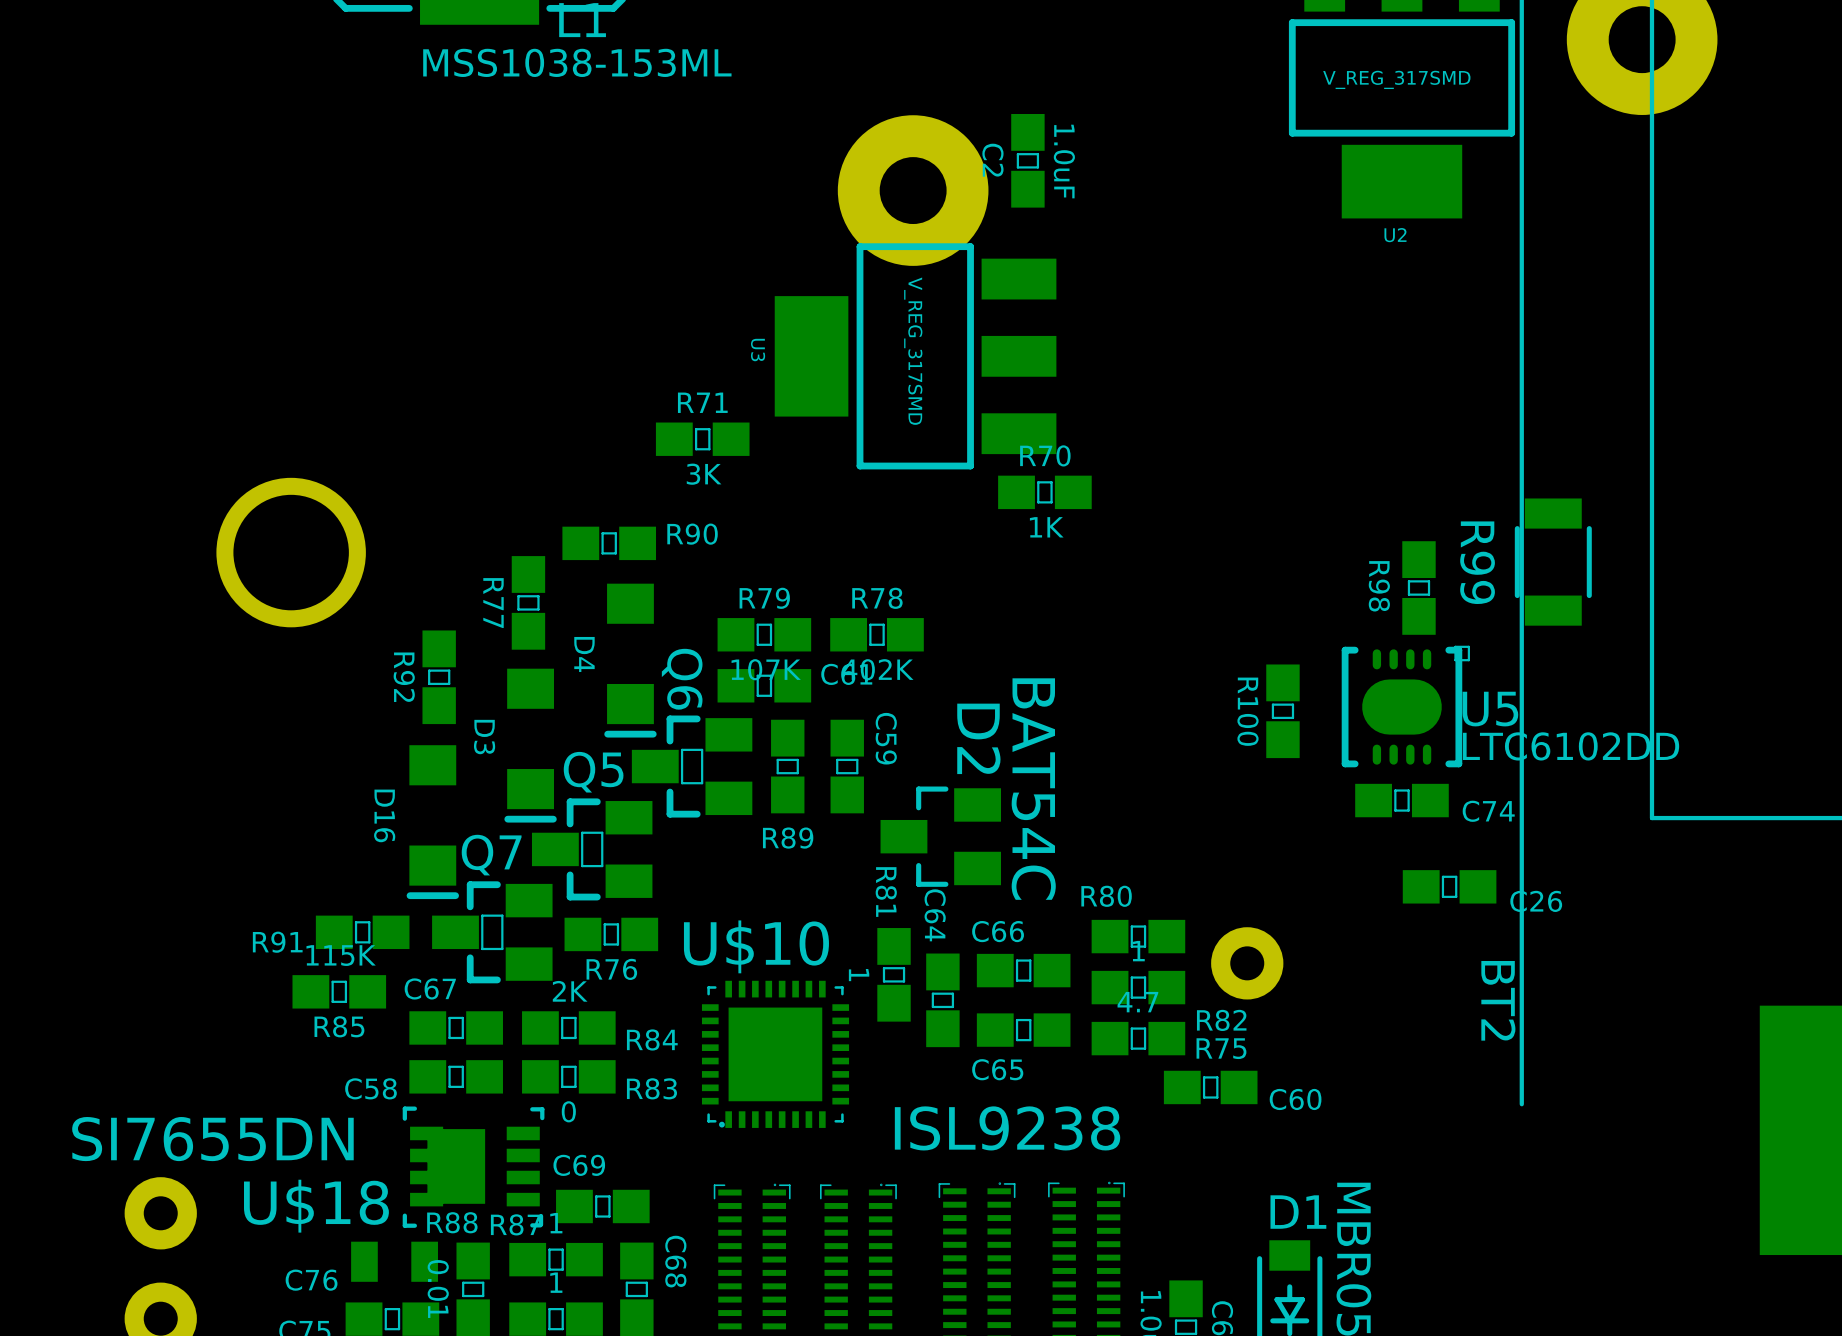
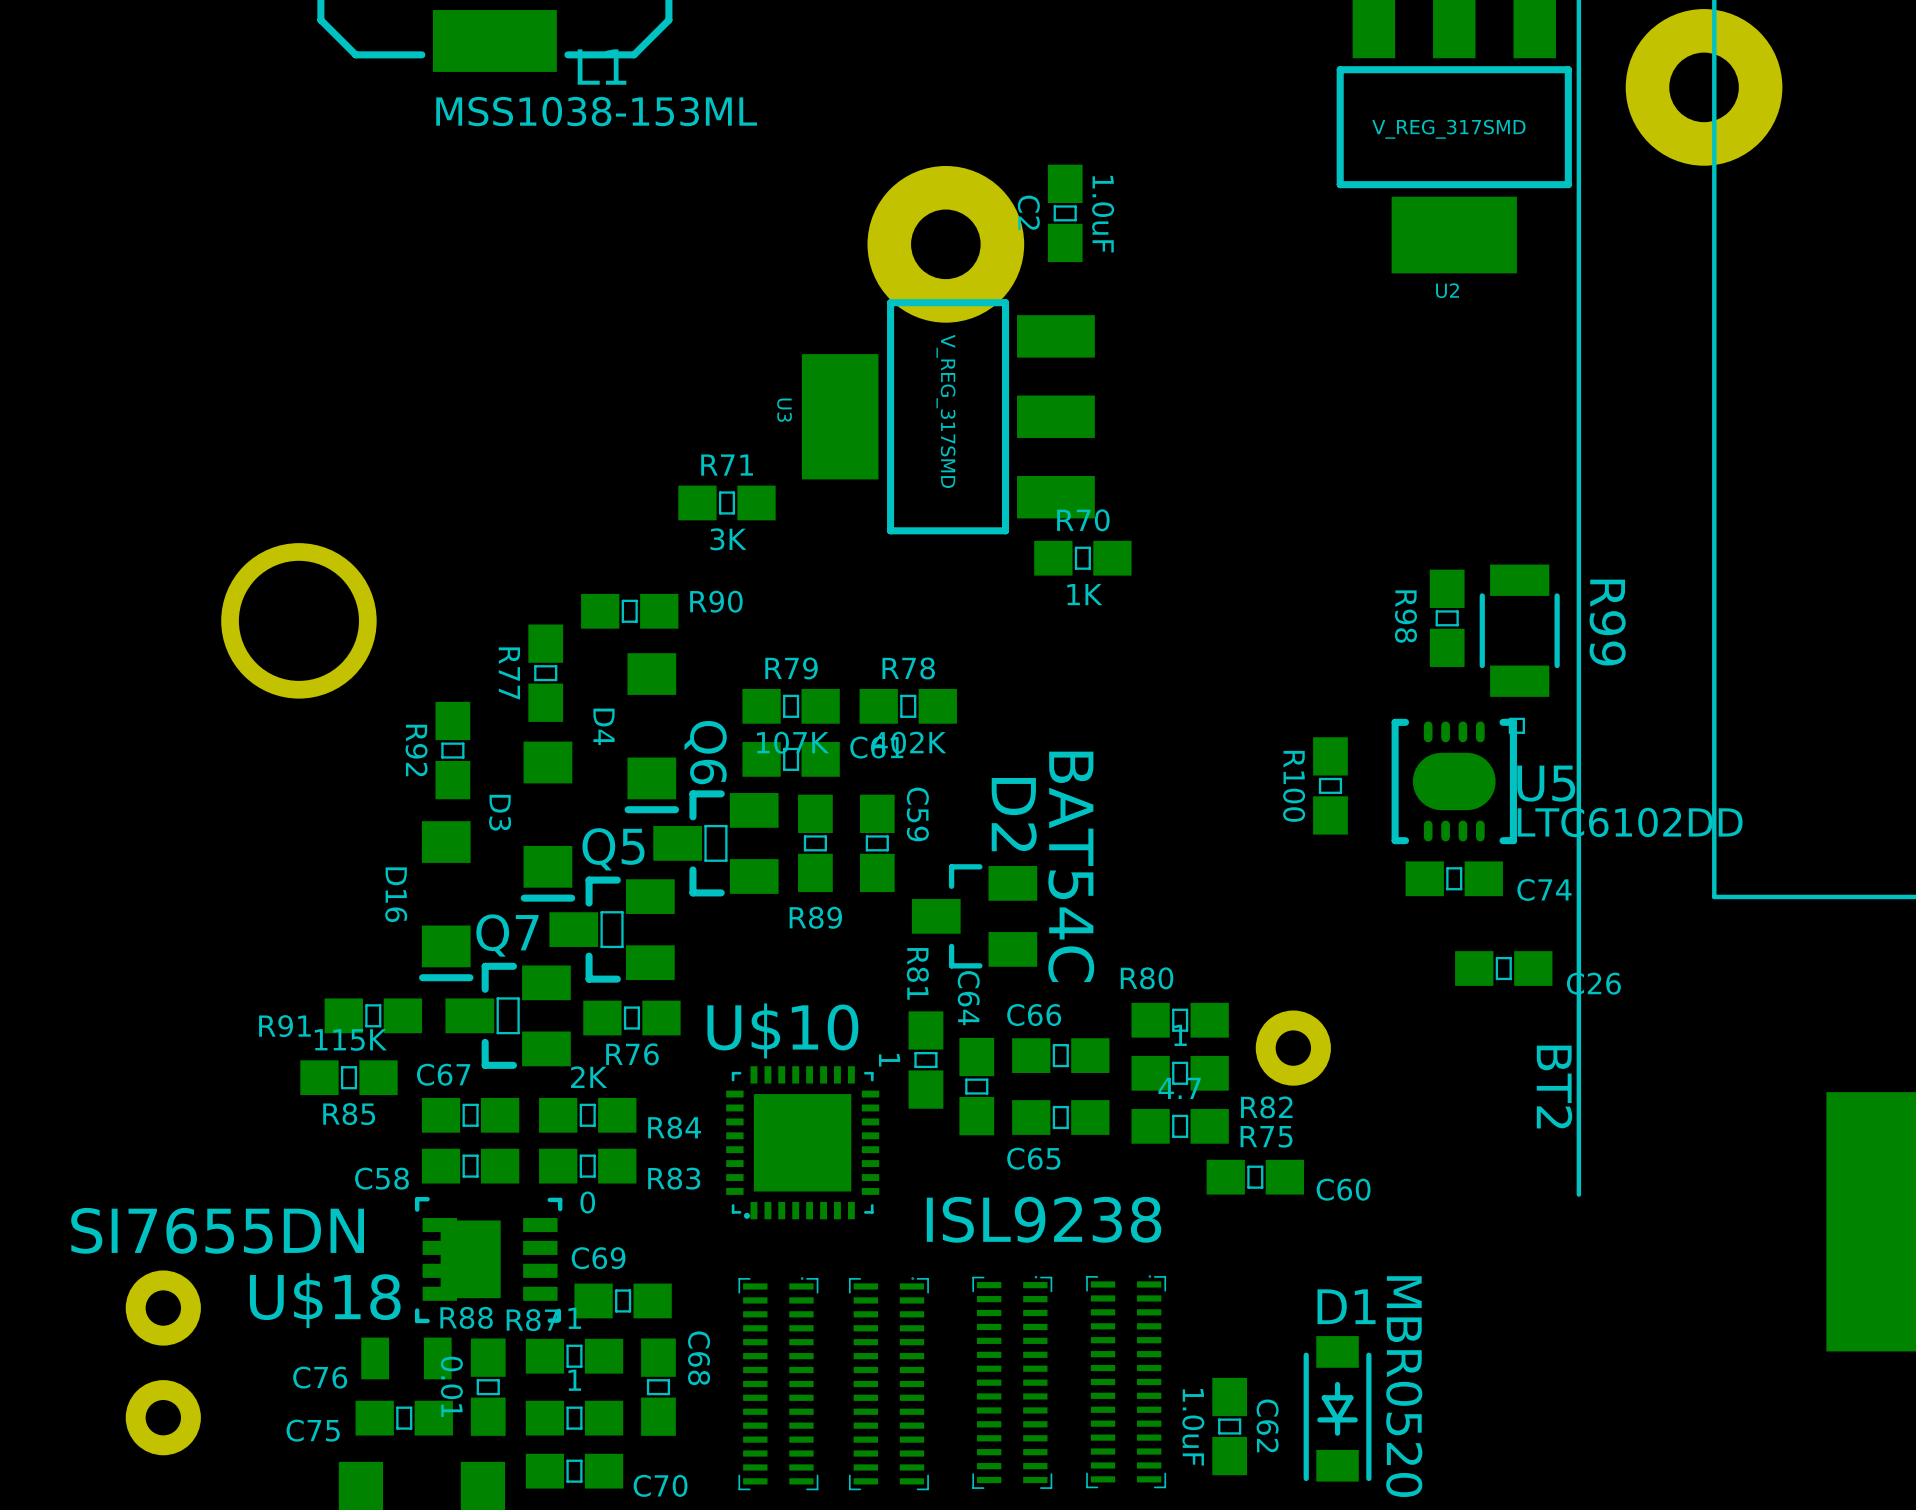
R99 name position: R99 (1477, 562) -> R99 (1607, 622)
R99 position: (1553, 562) -> (1519, 630)
R98 position: (1418, 588) -> (1447, 618)

